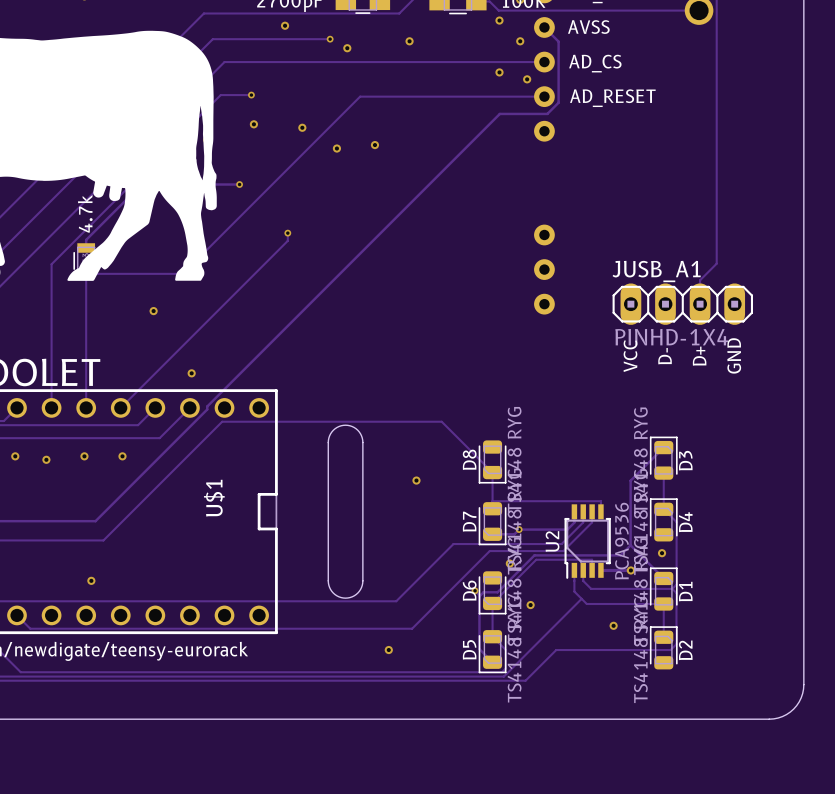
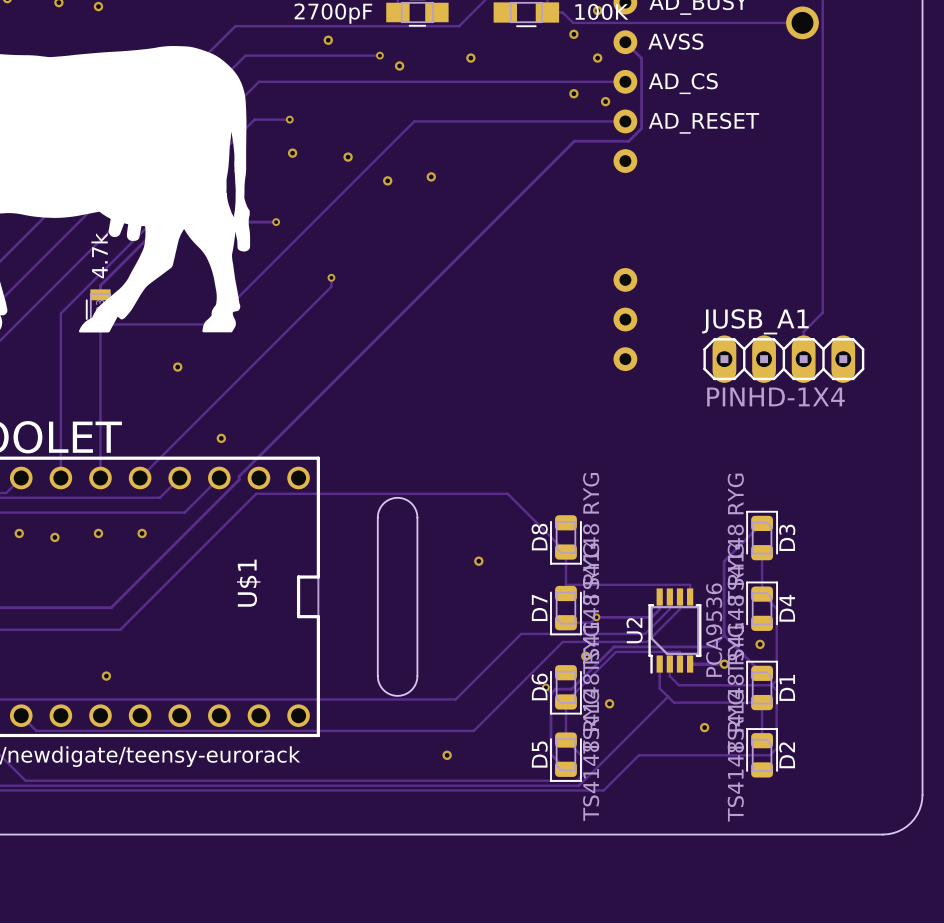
text: GND (734, 355) -> none
text: VCC (630, 356) -> none
text: D- (665, 356) -> none
text: D+ (699, 356) -> none

